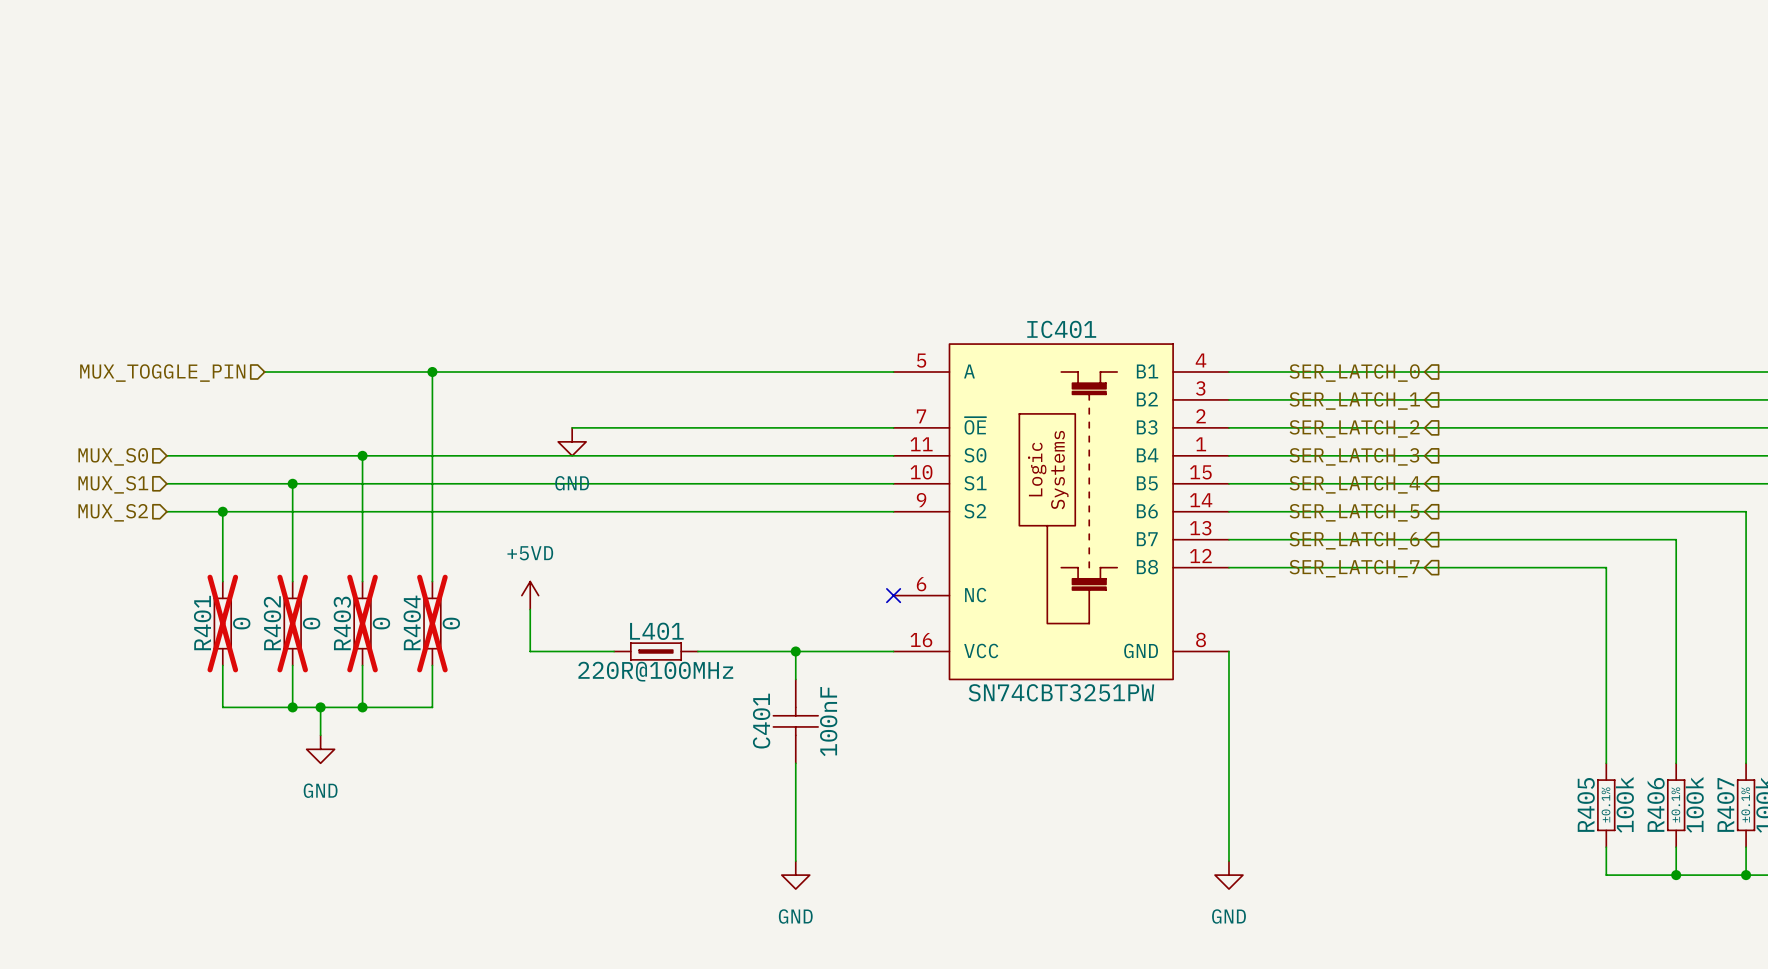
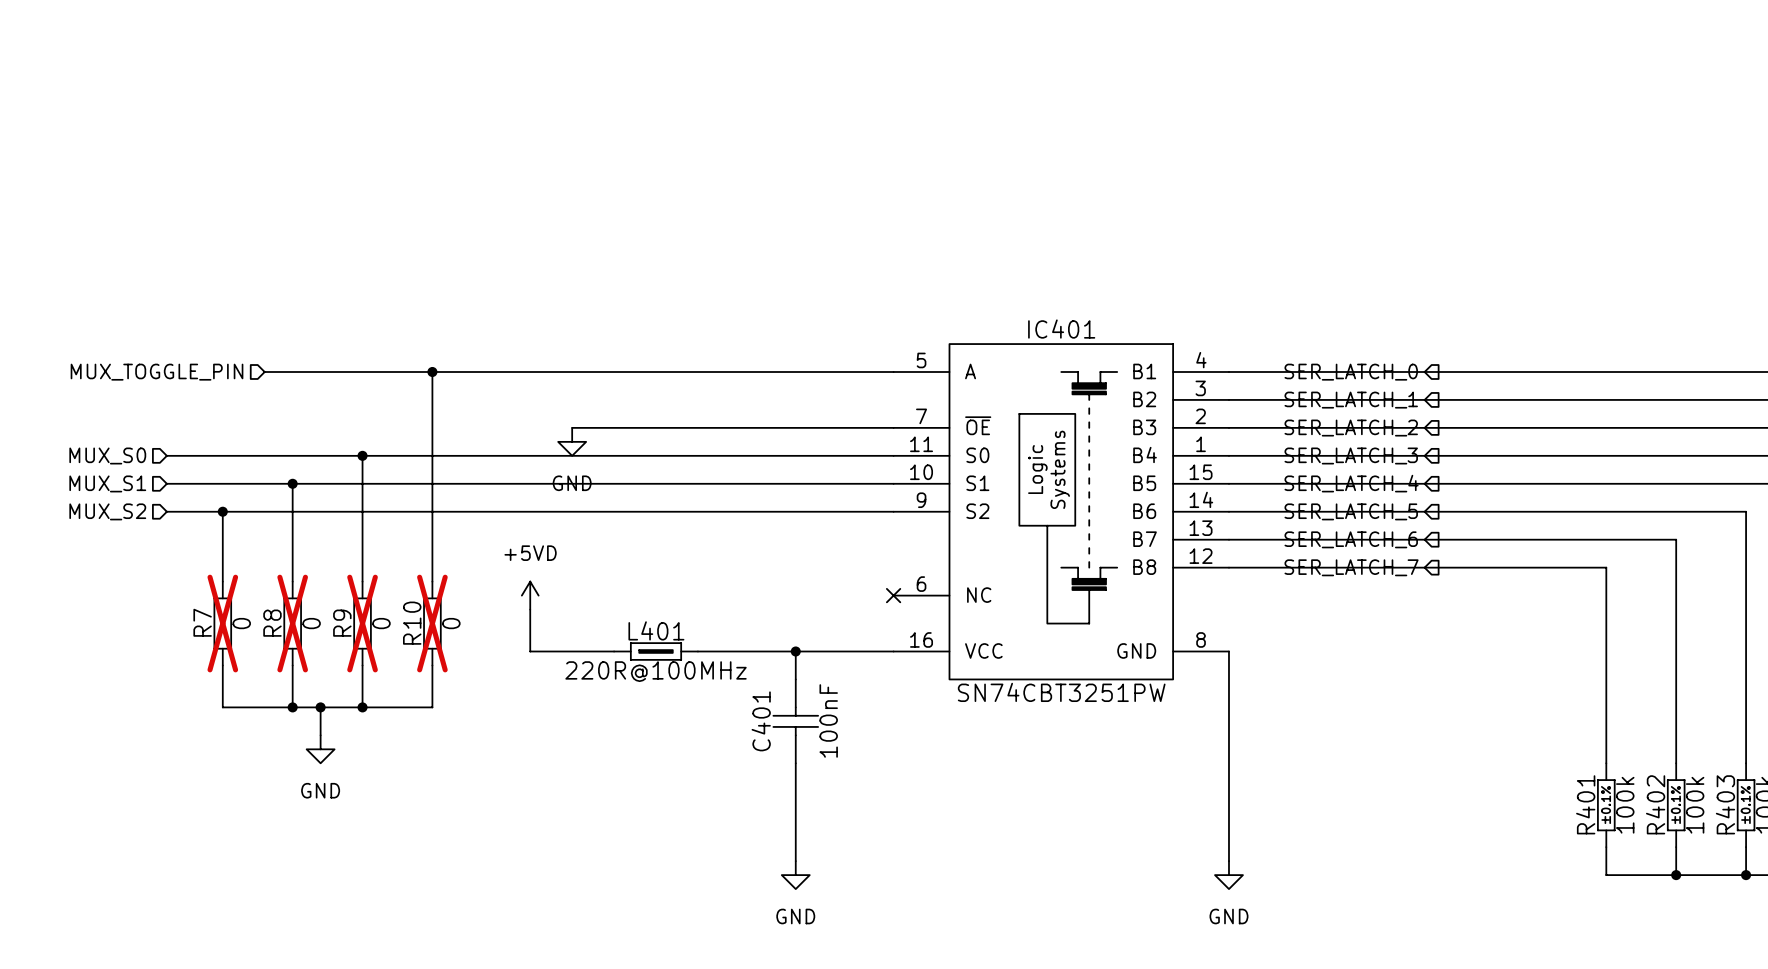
R404 name: R404 (412, 622) -> R10 (412, 623)
R401 name: R401 (202, 623) -> R7 (202, 622)
R402 name: R402 (272, 623) -> R8 (272, 623)
R403 name: R403 (342, 623) -> R9 (342, 623)
R405 name: R405 (1586, 804) -> R401 (1585, 804)
R406 name: R406 (1655, 804) -> R402 (1655, 804)
R407 name: R407 (1725, 804) -> R403 (1725, 804)

